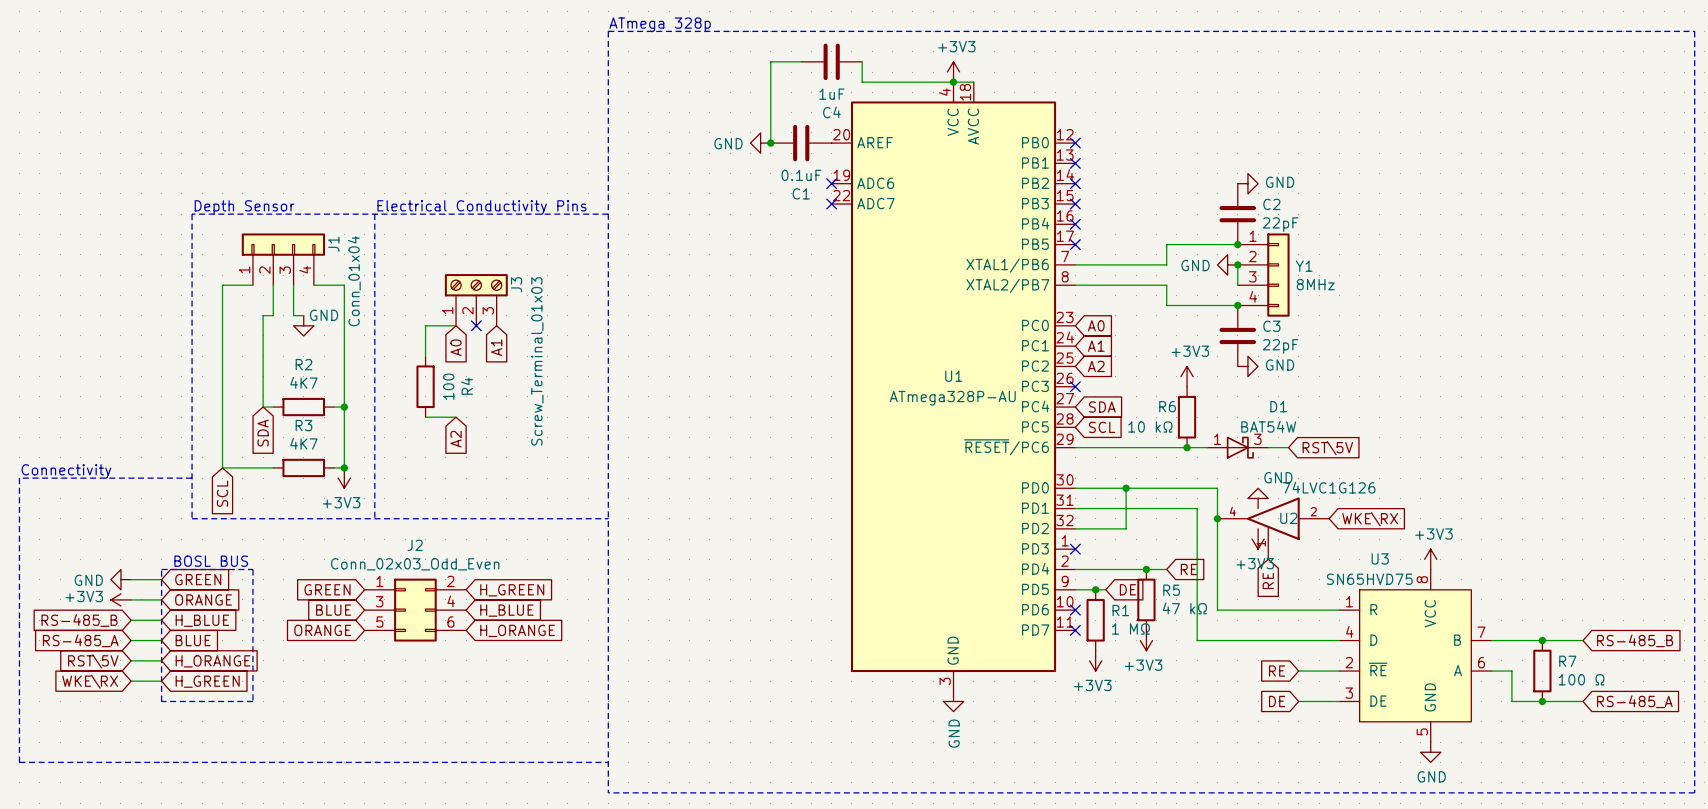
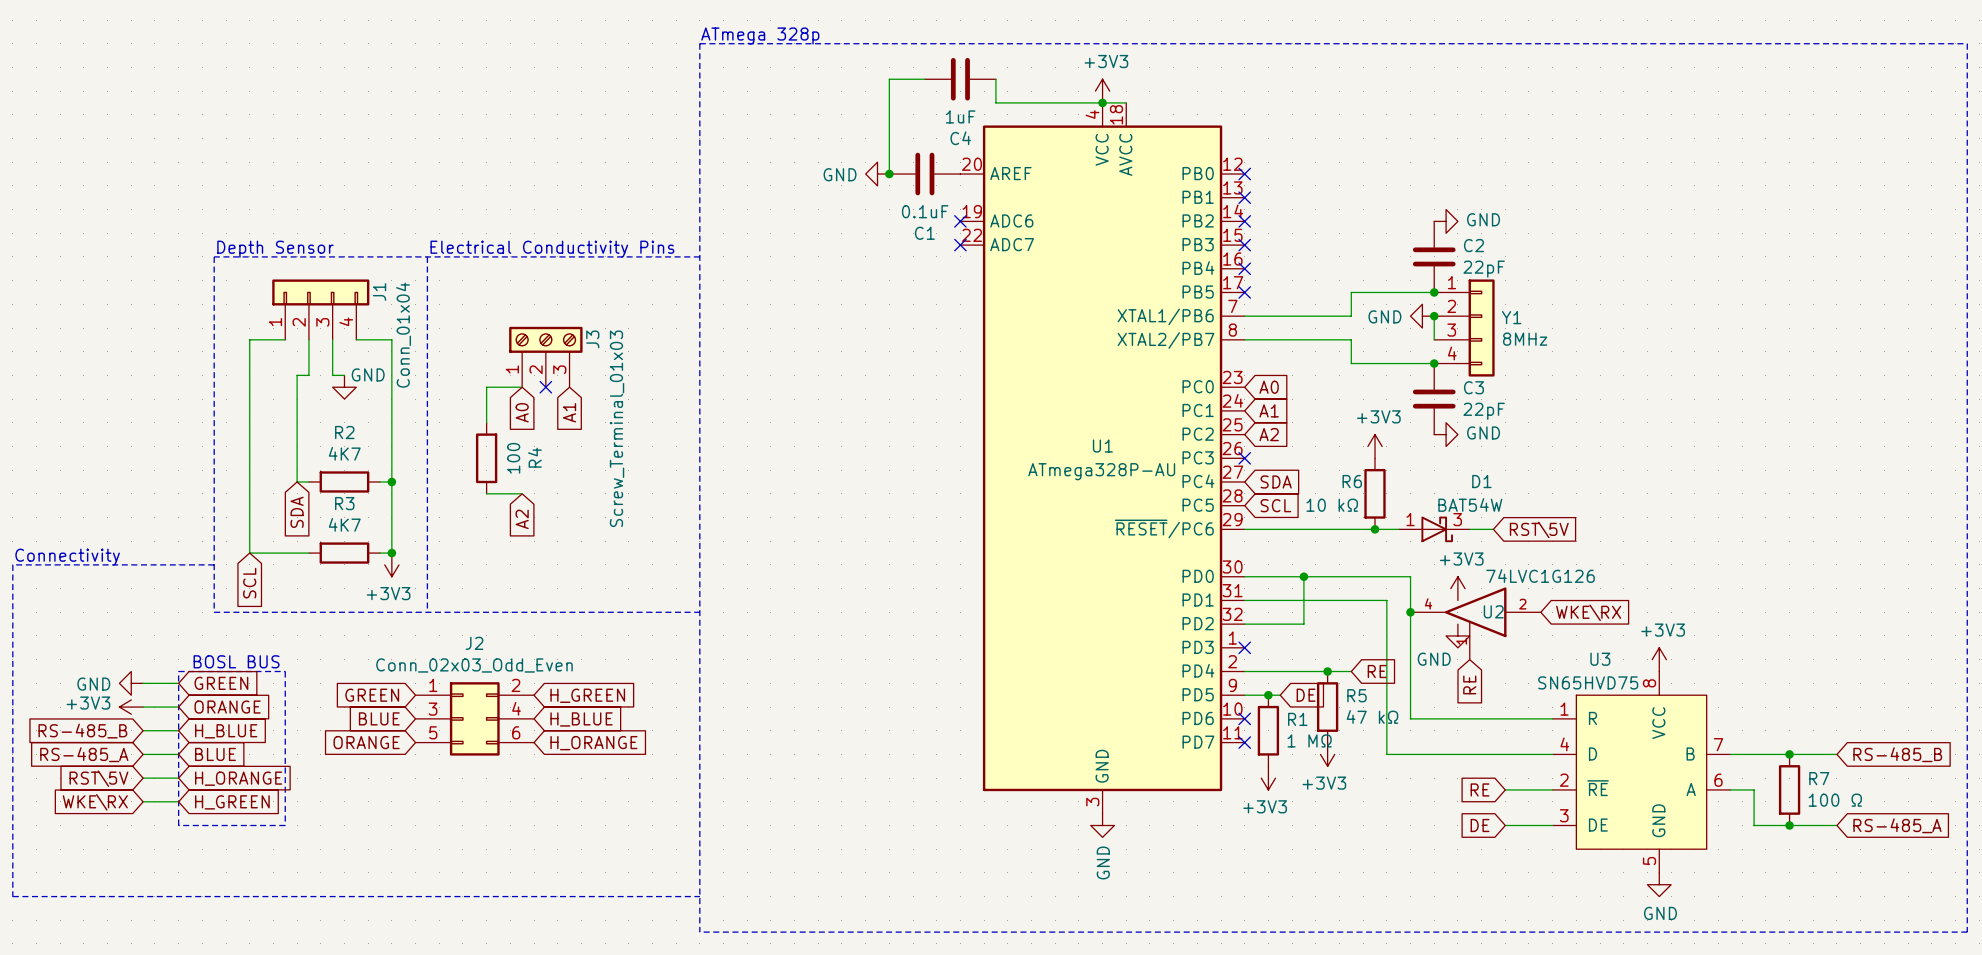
power symbol: GND (1258, 498) -> +3V3 (1457, 588)
power symbol: +3V3 (1258, 539) -> GND (1457, 635)

